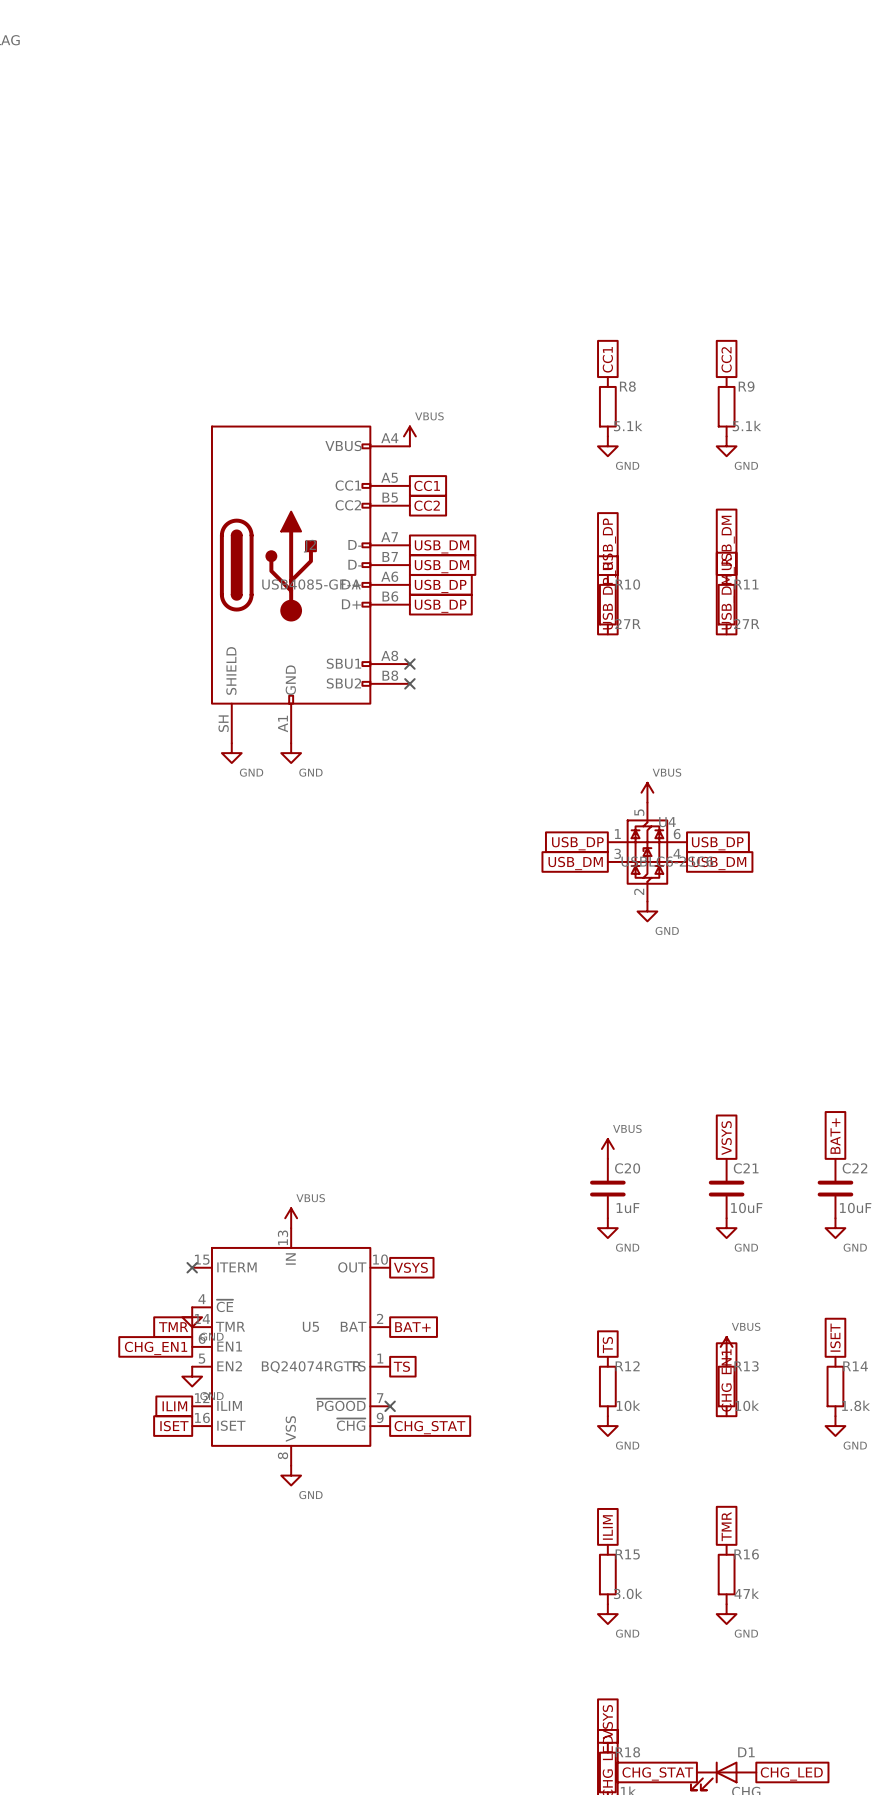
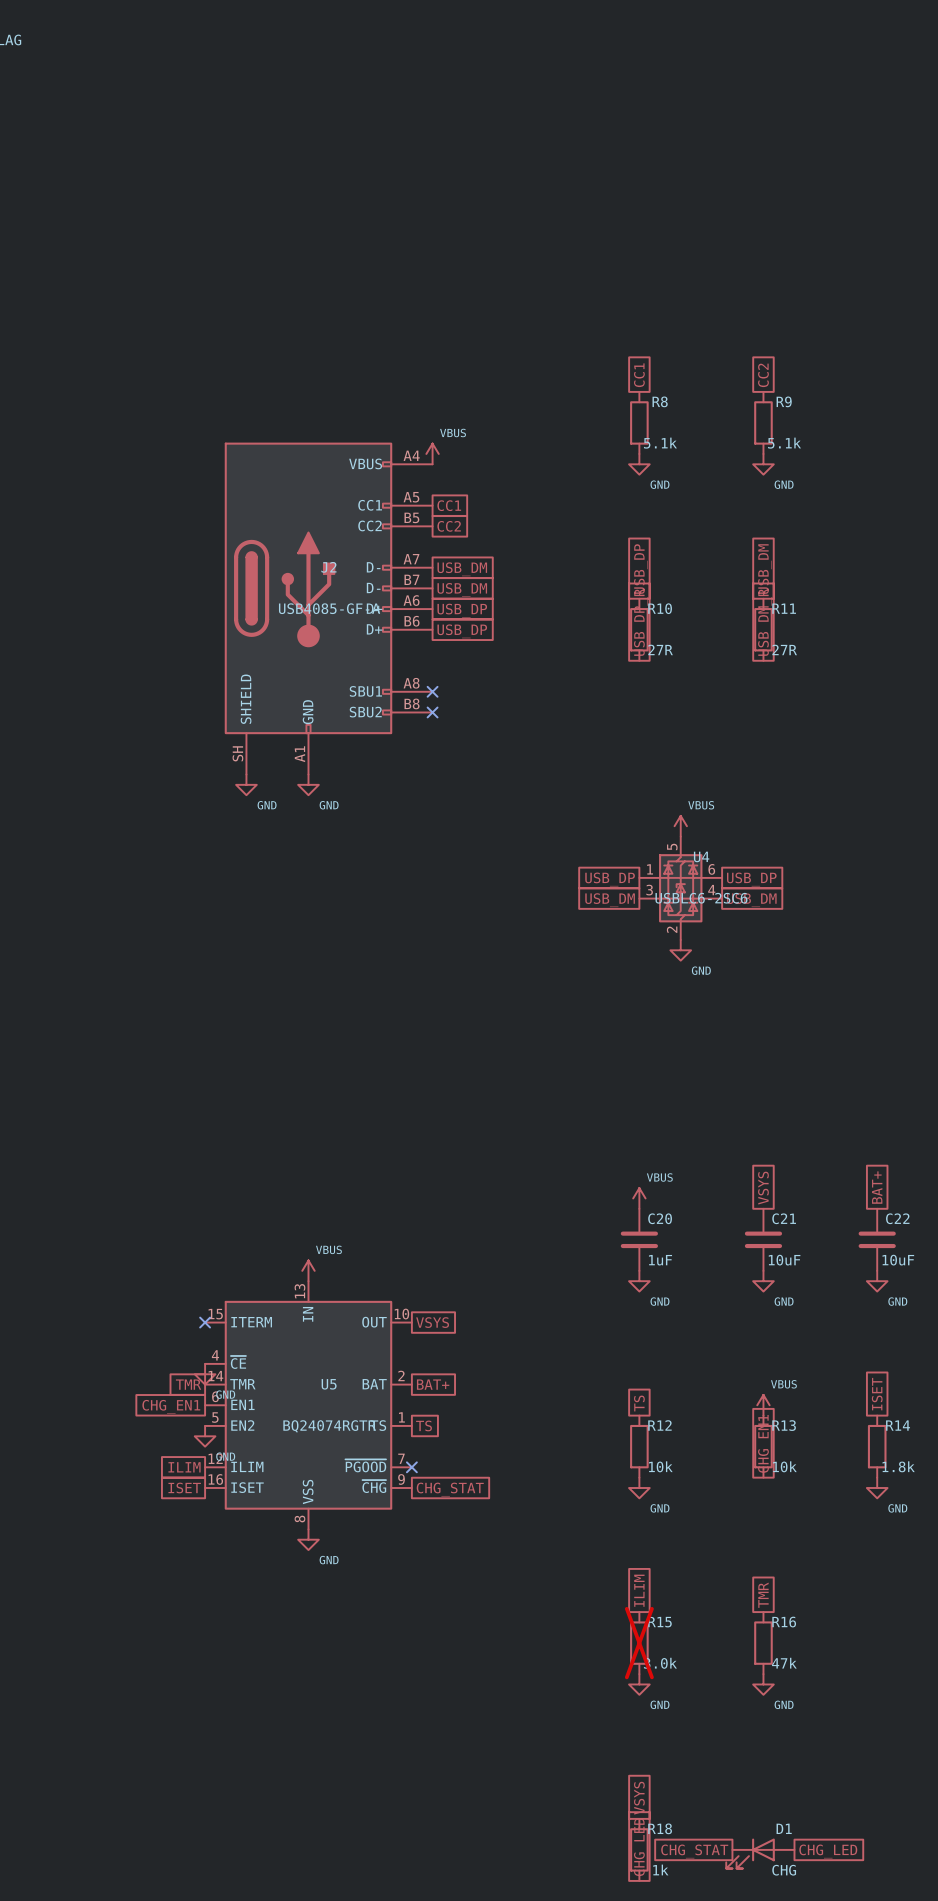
R15 do-not-place cross: none -> (639, 1643)

